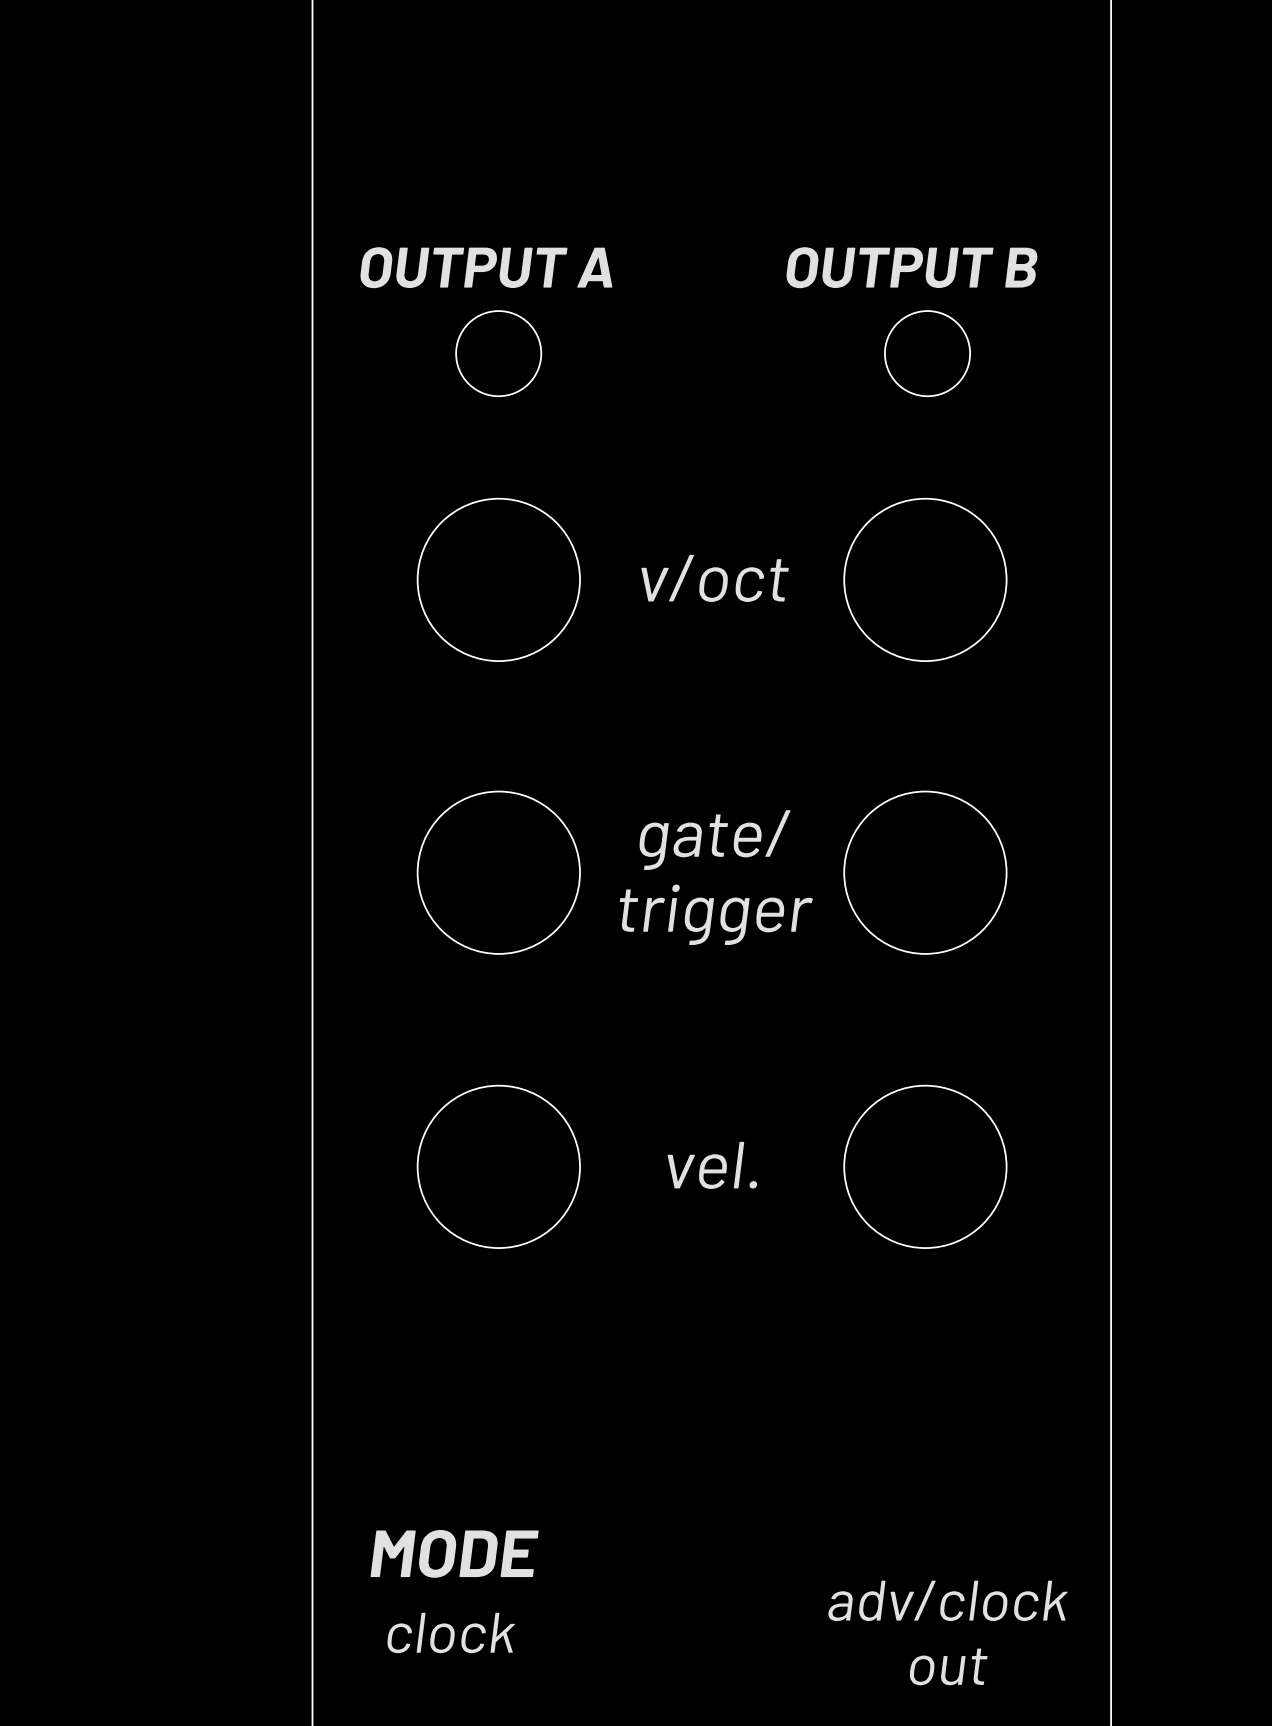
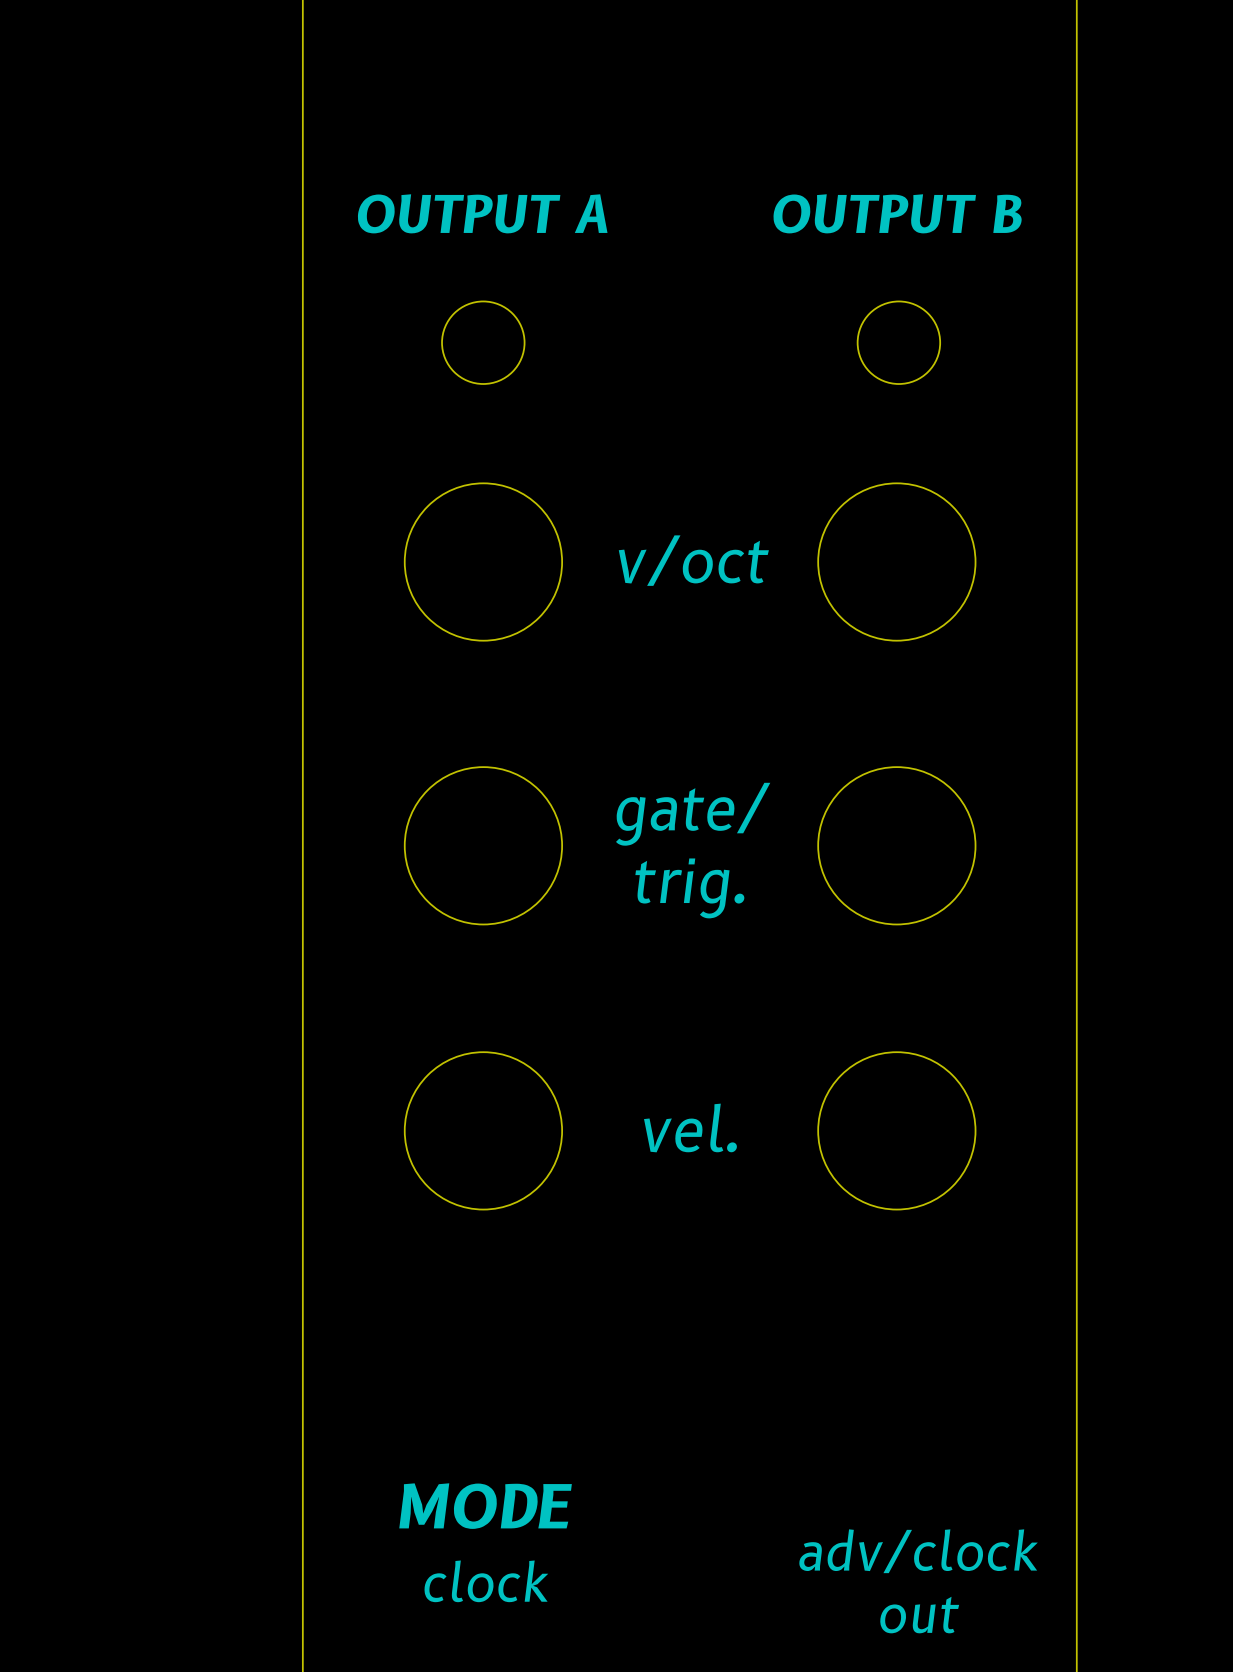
text position: OUTPUT A (486, 267) -> OUTPUT A (482, 213)
text position: OUTPUT B (912, 267) -> OUTPUT B (897, 213)
text: trigger (716, 914) -> trig. (689, 888)
text position: MODE (454, 1553) -> MODE (485, 1506)
text position: clock (451, 1633) -> clock (486, 1581)

